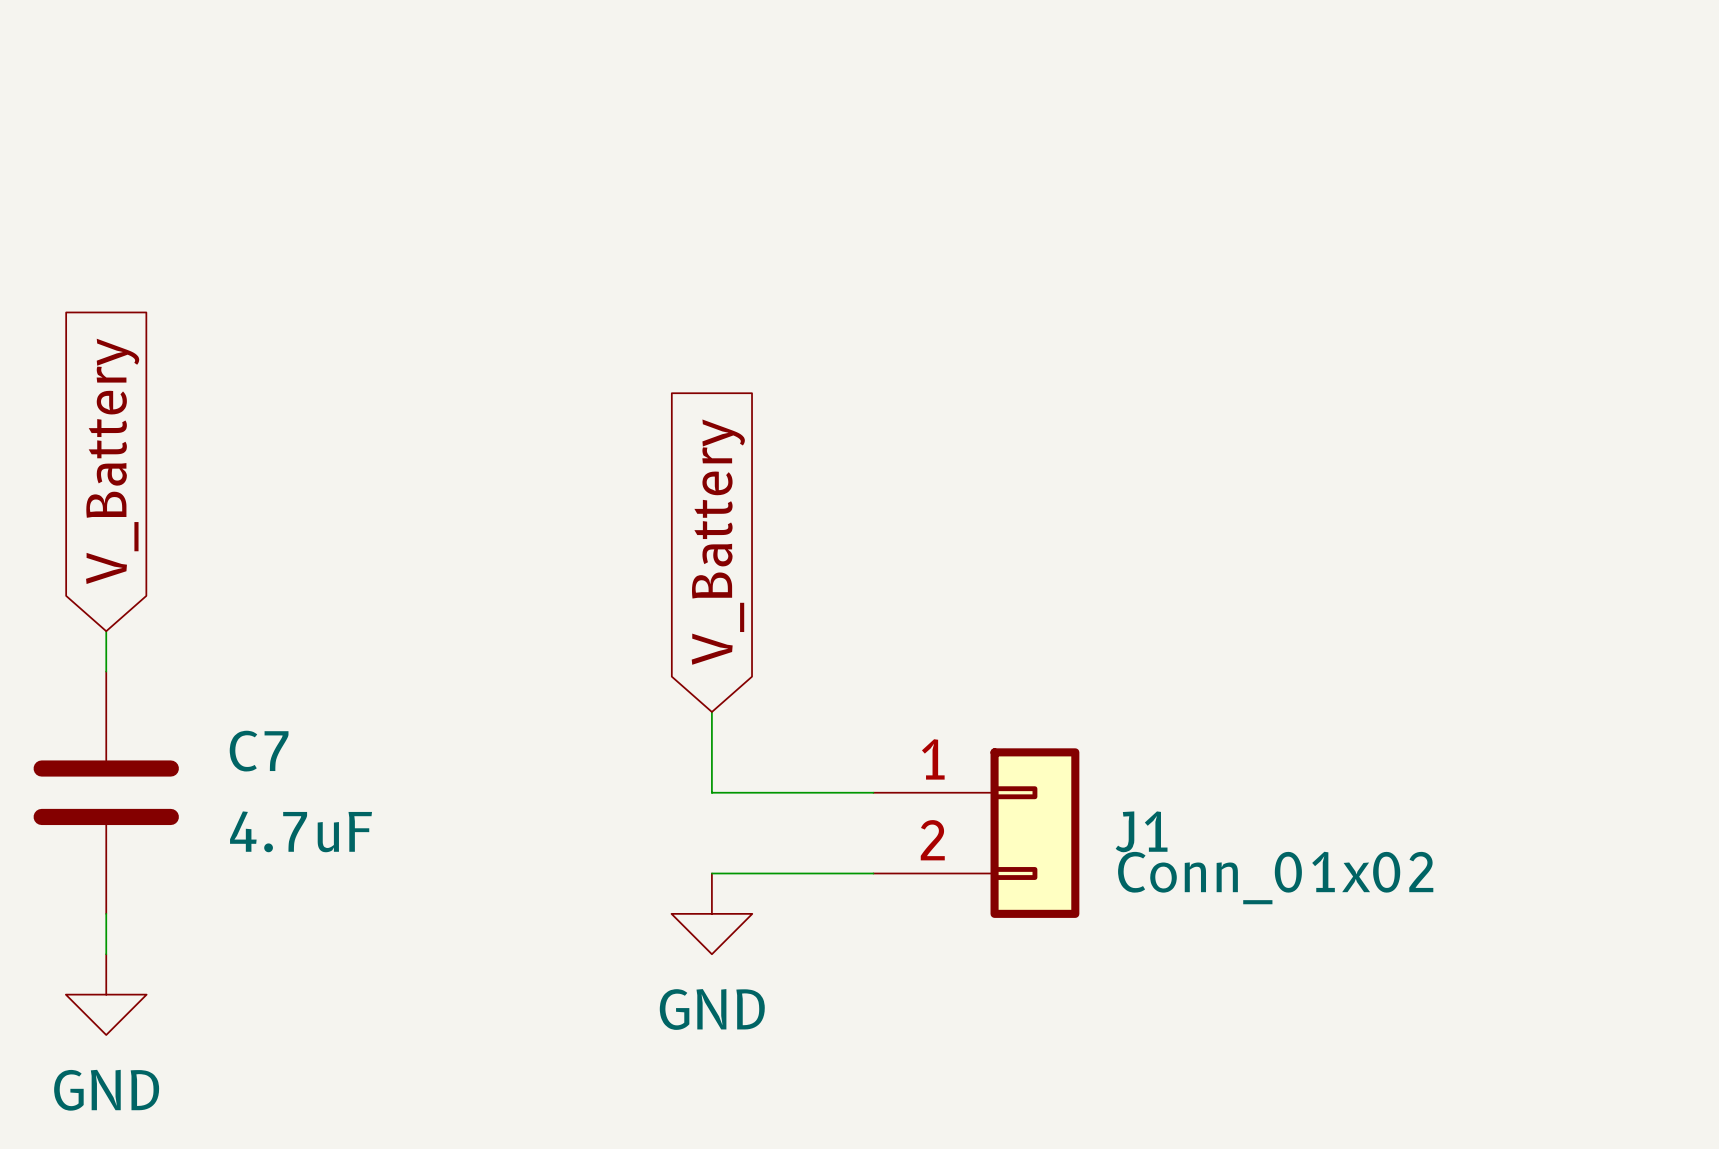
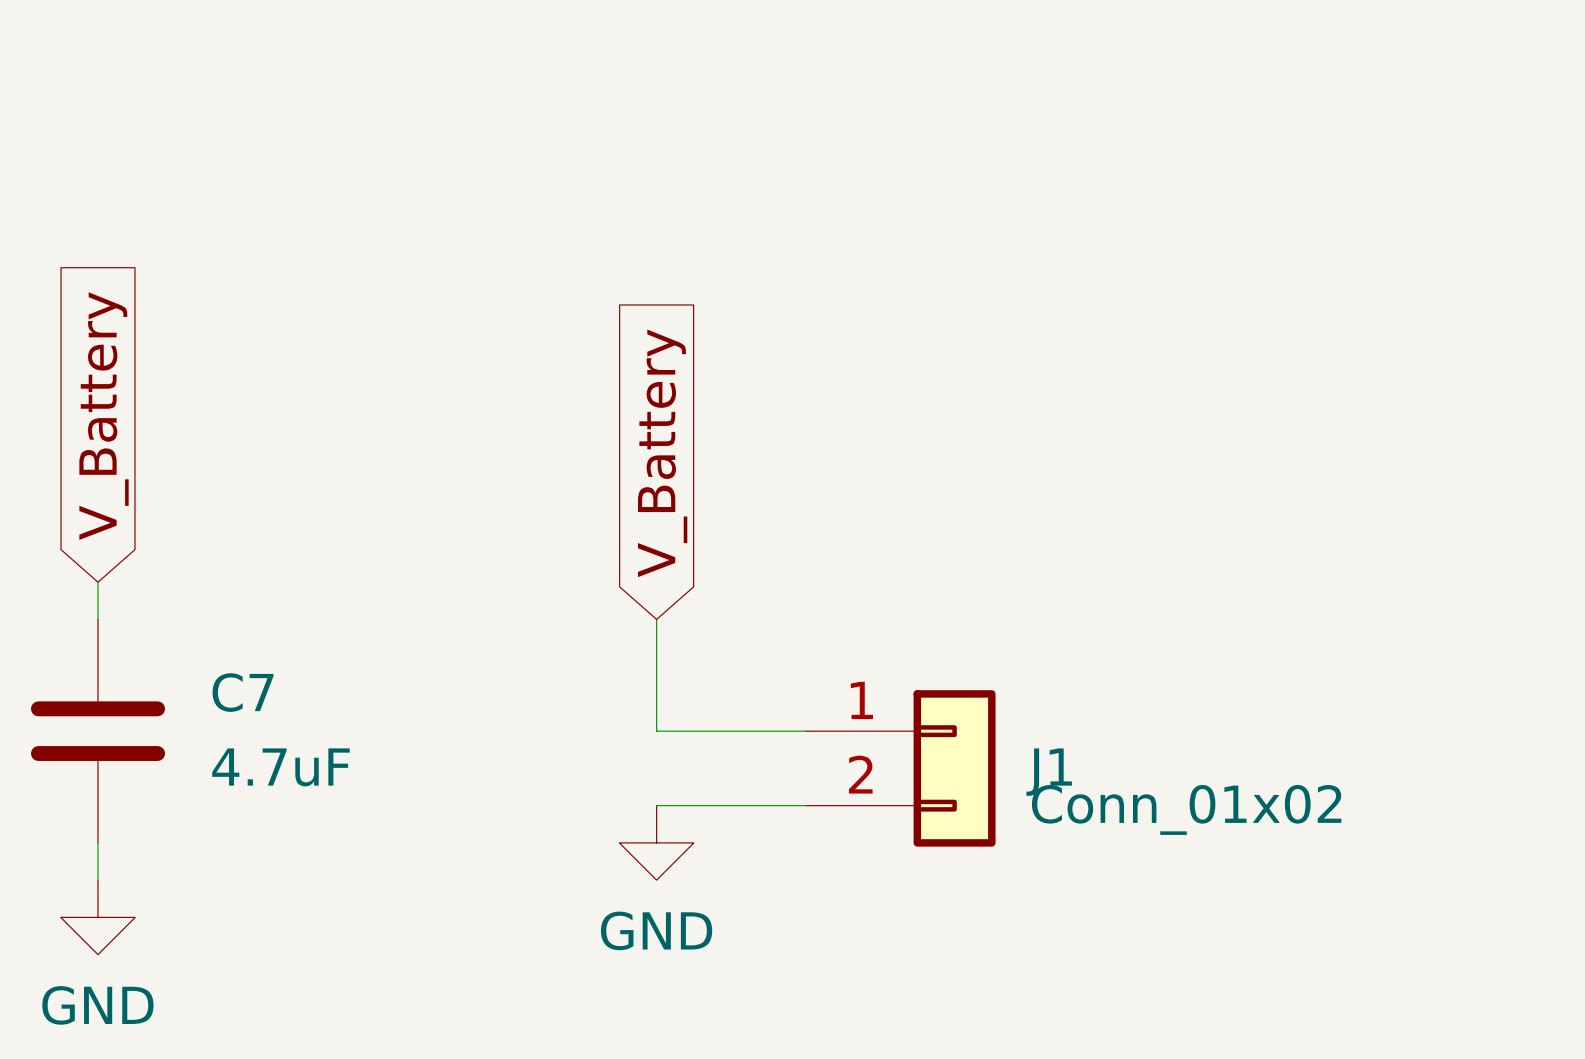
global label position: V_Battery (718, 542) -> V_Battery (662, 453)
wire: none -> (656, 619) (656, 656)

